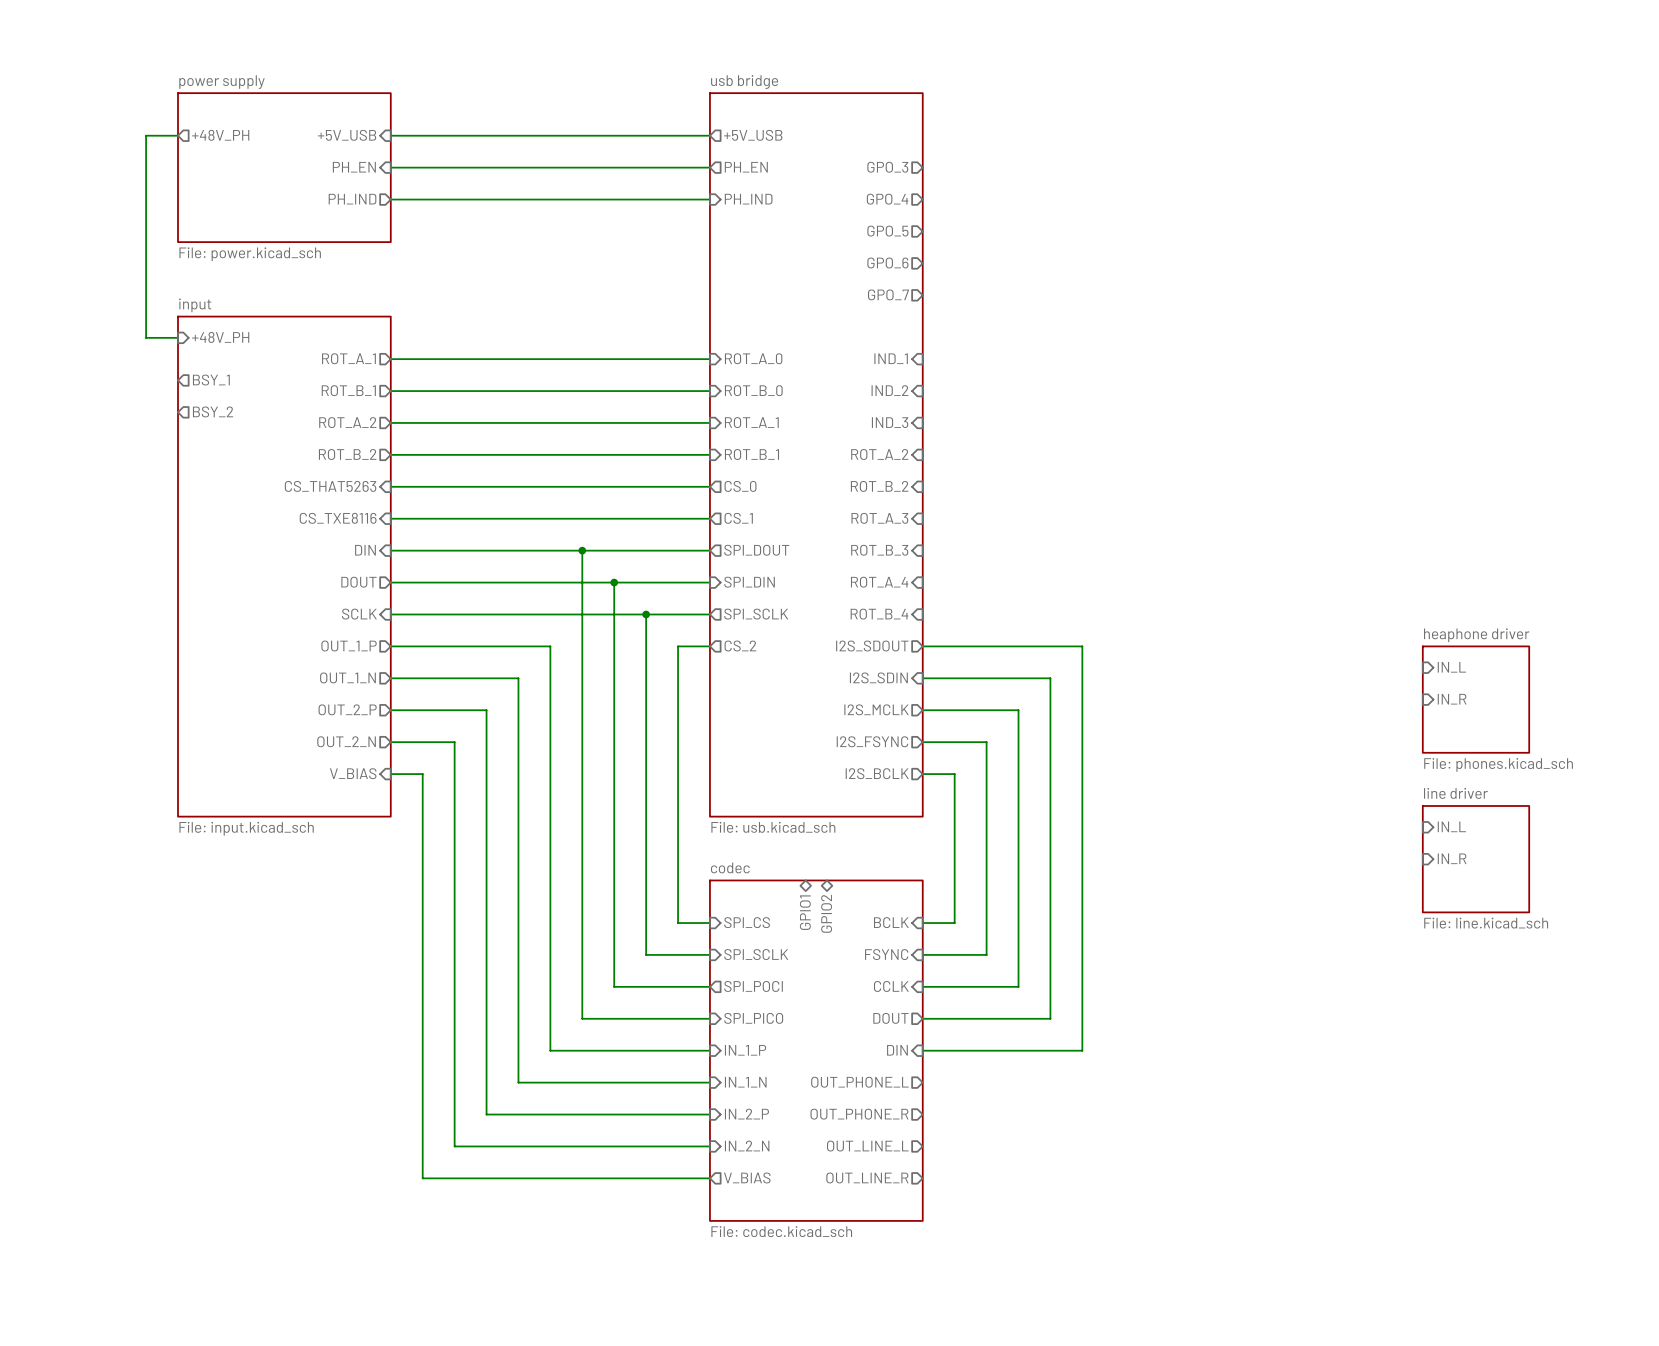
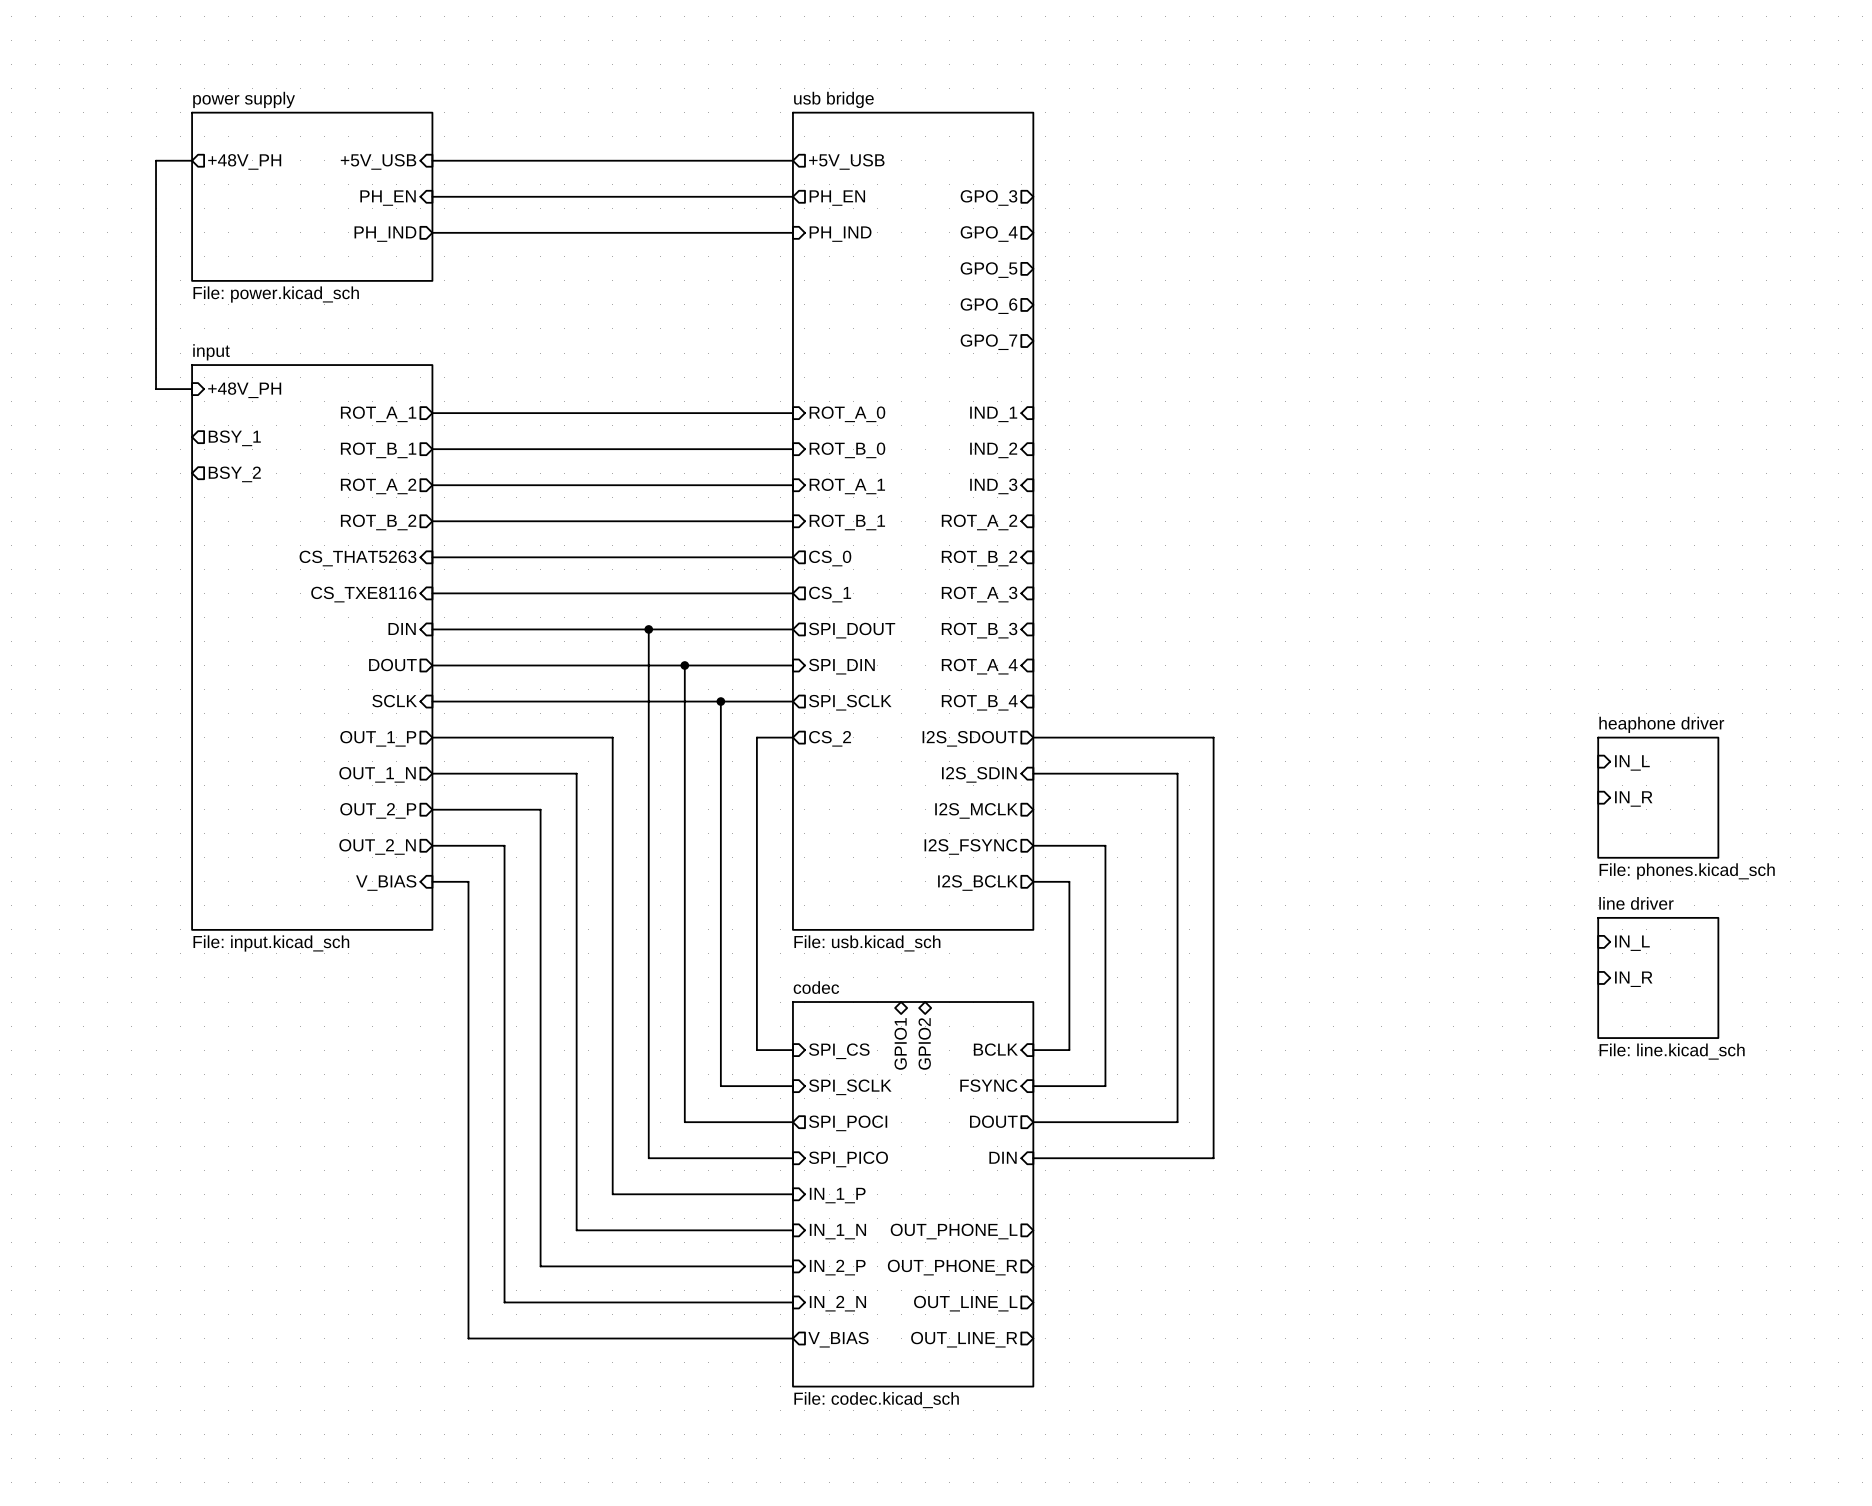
wire: (922, 710) (1018, 710) (1018, 986) -> none
sheet pin shape: input (891, 986) -> output (993, 1121)
sheet pin: CCLK (891, 986) -> DOUT (993, 1121)
wire: (1050, 986) (1050, 1018) -> (1177, 1122) (1141, 1122)
sheet pin shape: output (890, 1018) -> input (1003, 1157)
sheet pin: DOUT (890, 1018) -> DIN (1003, 1157)
wire: (1082, 1018) (1082, 1050) (922, 1050) -> (1213, 1158) (1177, 1158)
sheet pin: DIN (897, 1050) -> none

